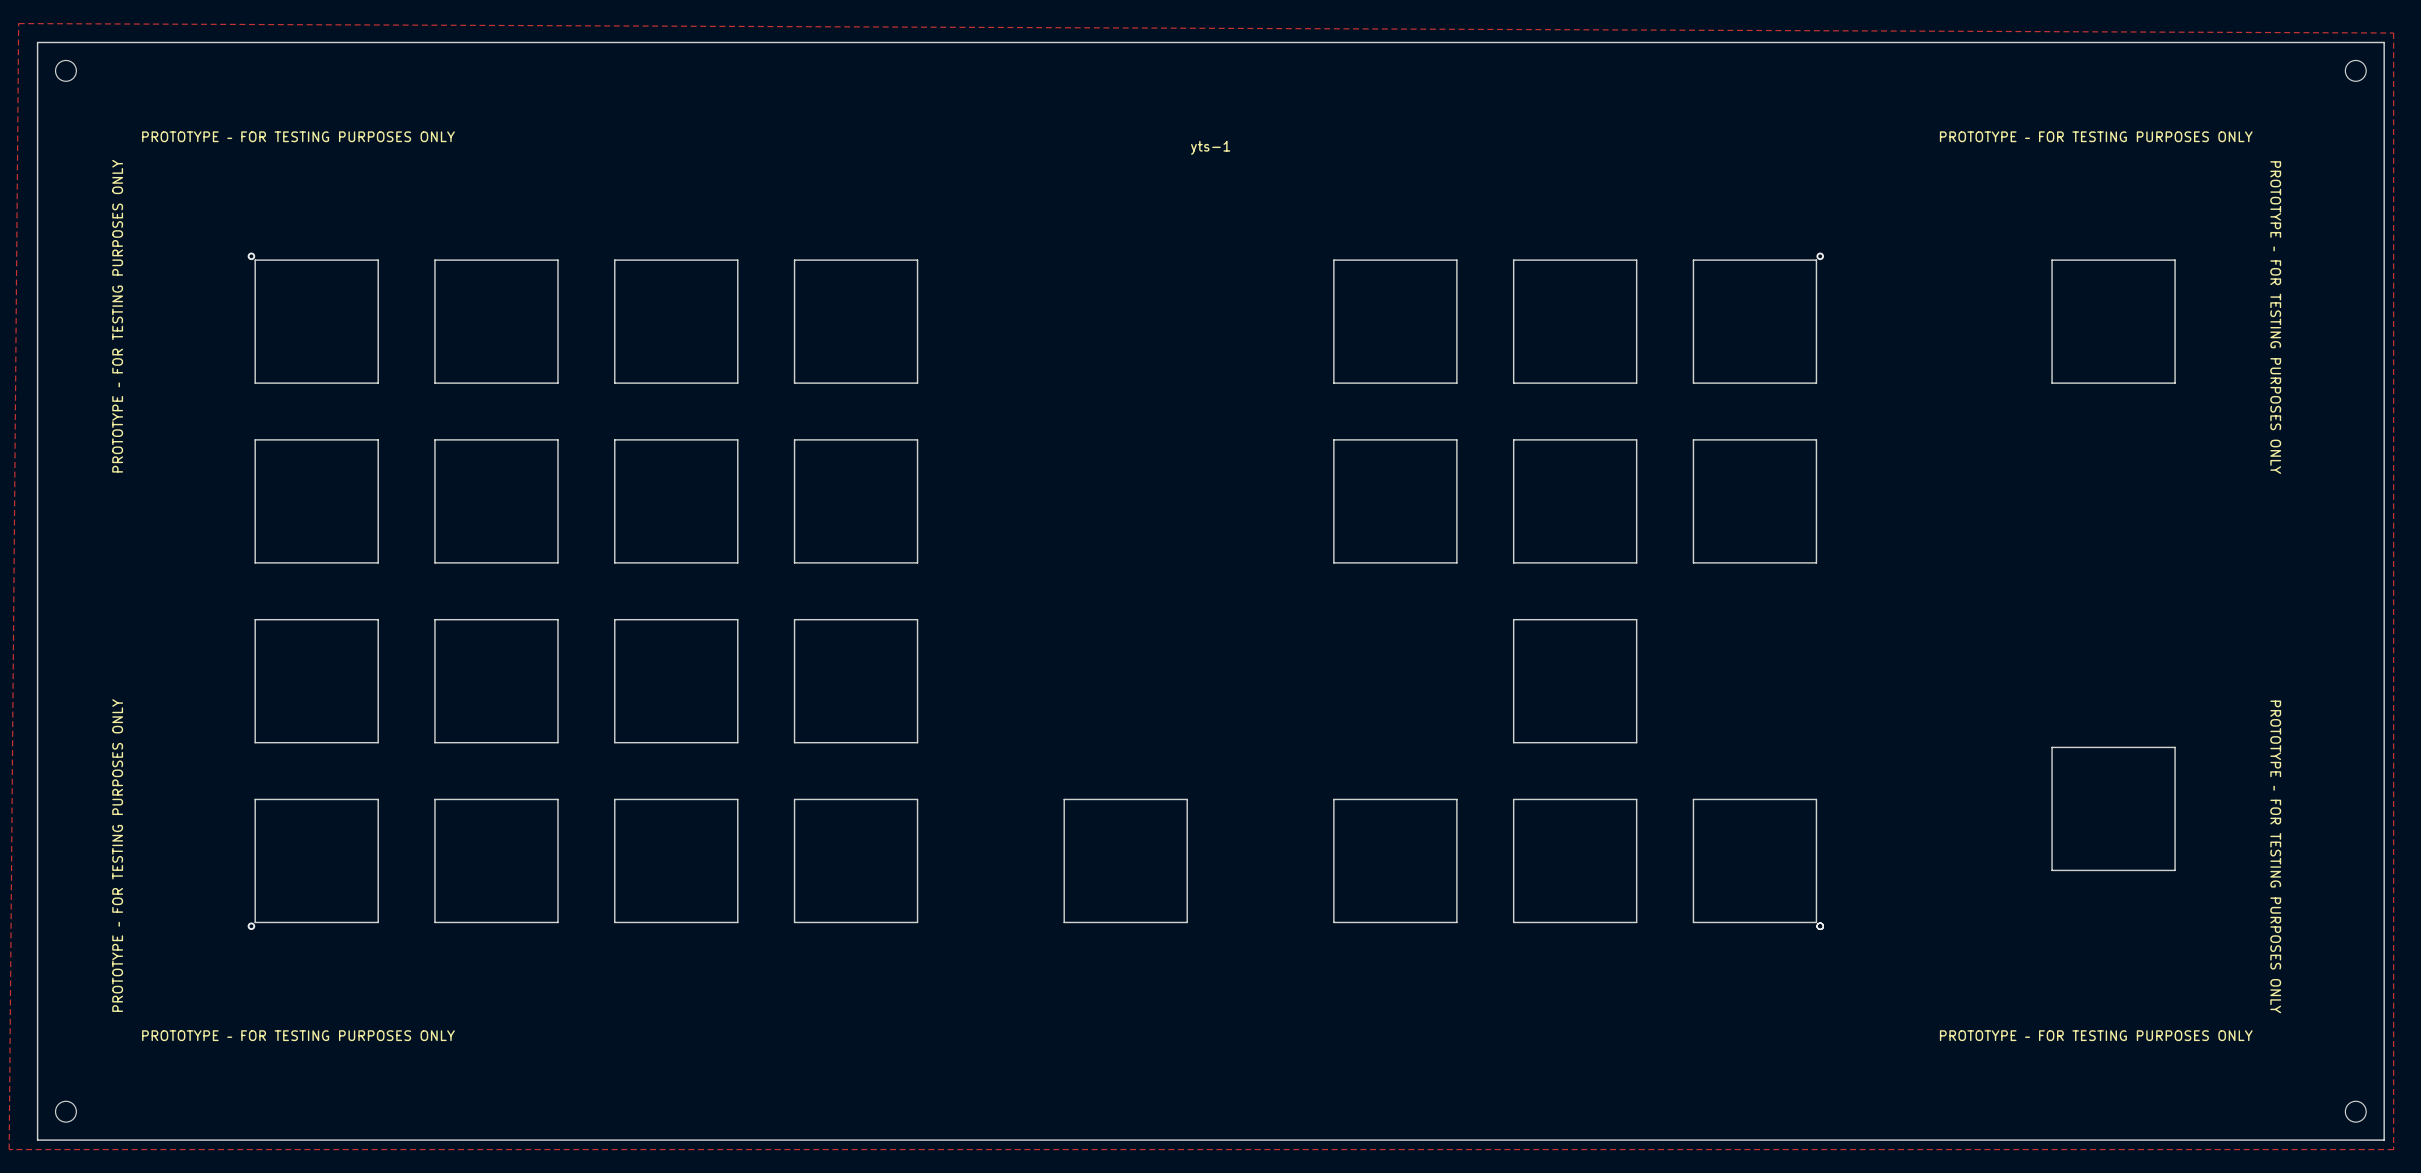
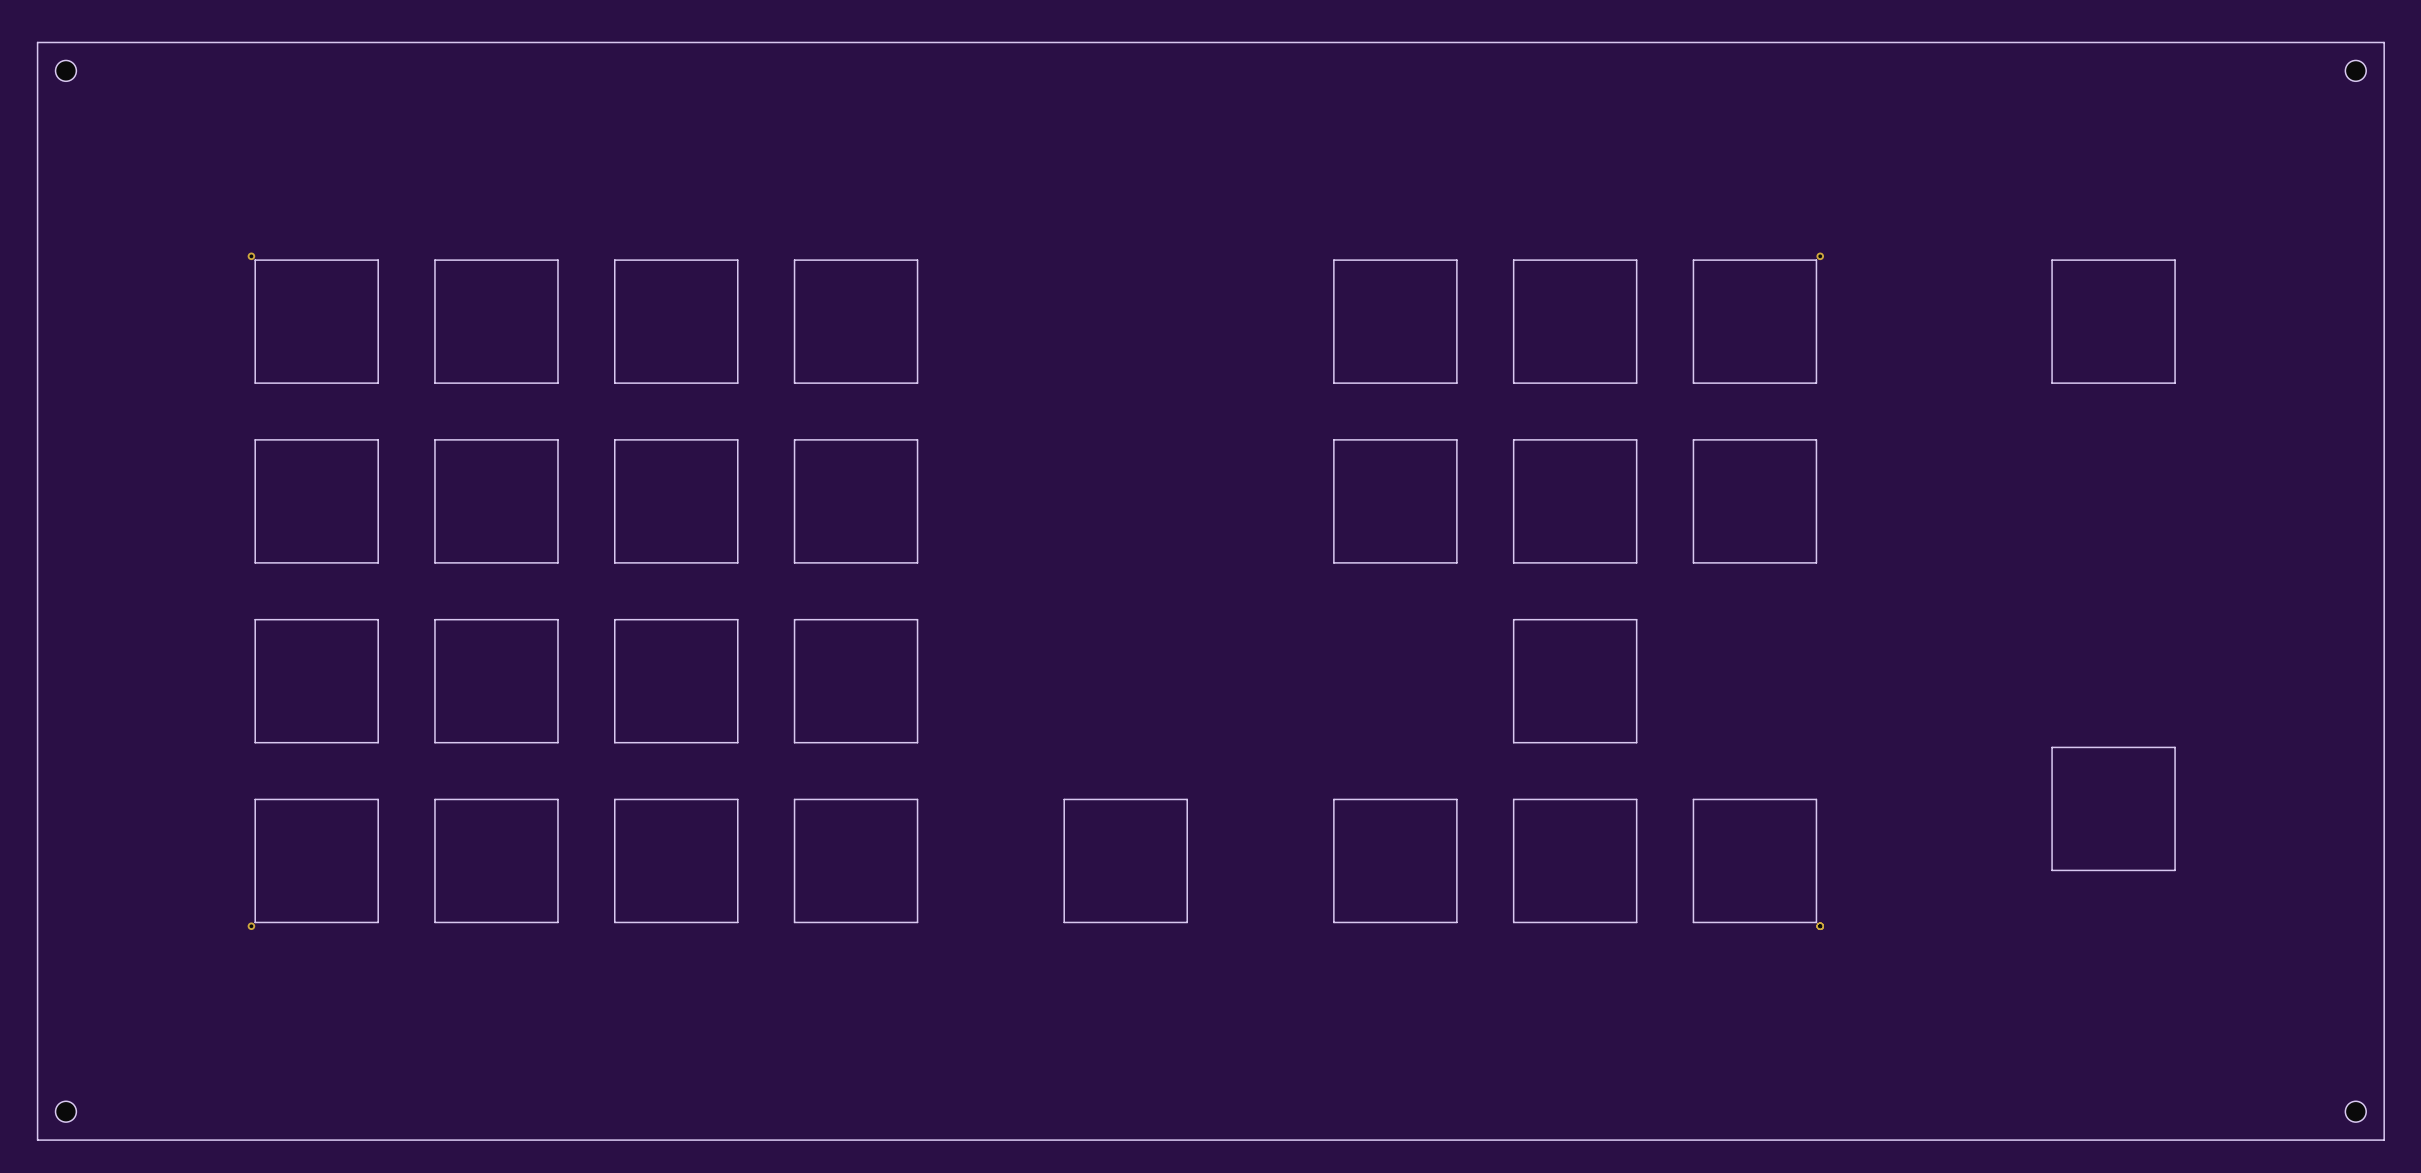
zone outline: (18, 23) (9, 1149) (2393, 1149) (2393, 33) (18, 23) -> none
text: PROTOTYPE – FOR TESTING PURPOSES ONLY (298, 136) -> none
text: PROTOTYPE – FOR TESTING PURPOSES ONLY (2096, 136) -> none
text: yts-1 (1210, 147) -> none
text: PROTOTYPE – FOR TESTING PURPOSES ONLY (117, 316) -> none
text: PROTOTYPE – FOR TESTING PURPOSES ONLY (2275, 317) -> none
text: PROTOTYPE – FOR TESTING PURPOSES ONLY (117, 855) -> none
text: PROTOTYPE – FOR TESTING PURPOSES ONLY (2275, 856) -> none
text: PROTOTYPE – FOR TESTING PURPOSES ONLY (298, 1035) -> none
text: PROTOTYPE – FOR TESTING PURPOSES ONLY (2096, 1035) -> none

